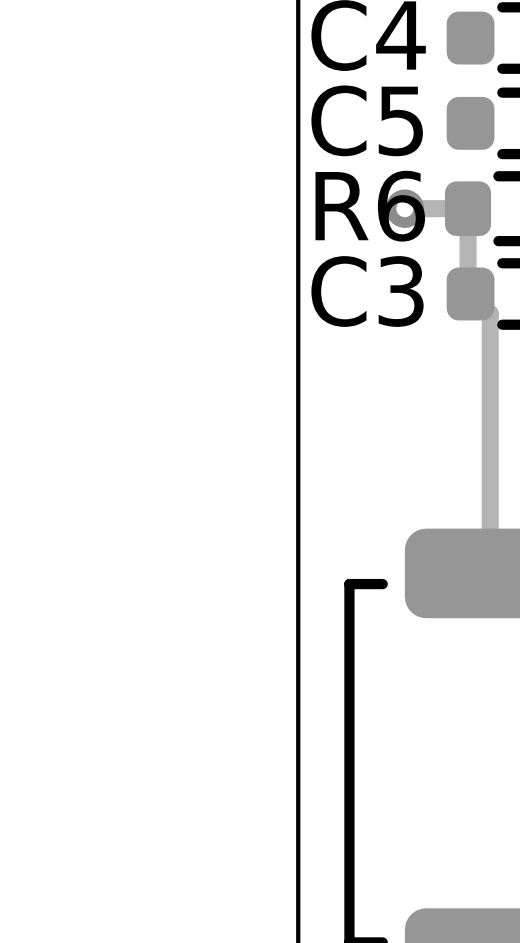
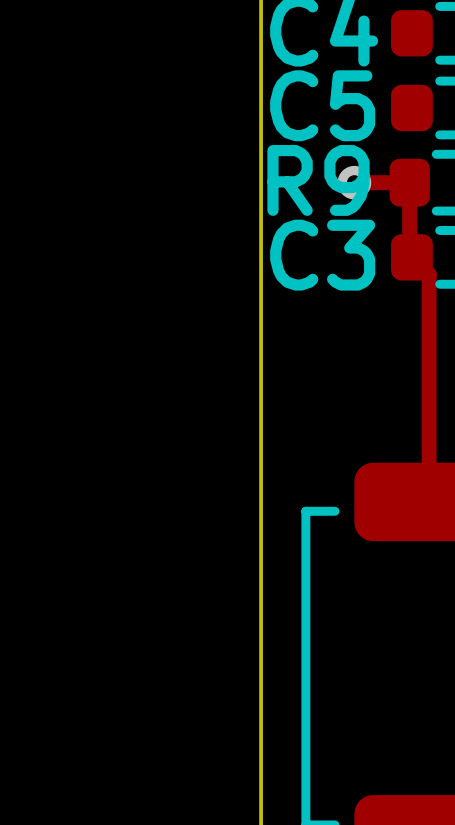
R6 name: R6 (370, 206) -> R9 (318, 180)

